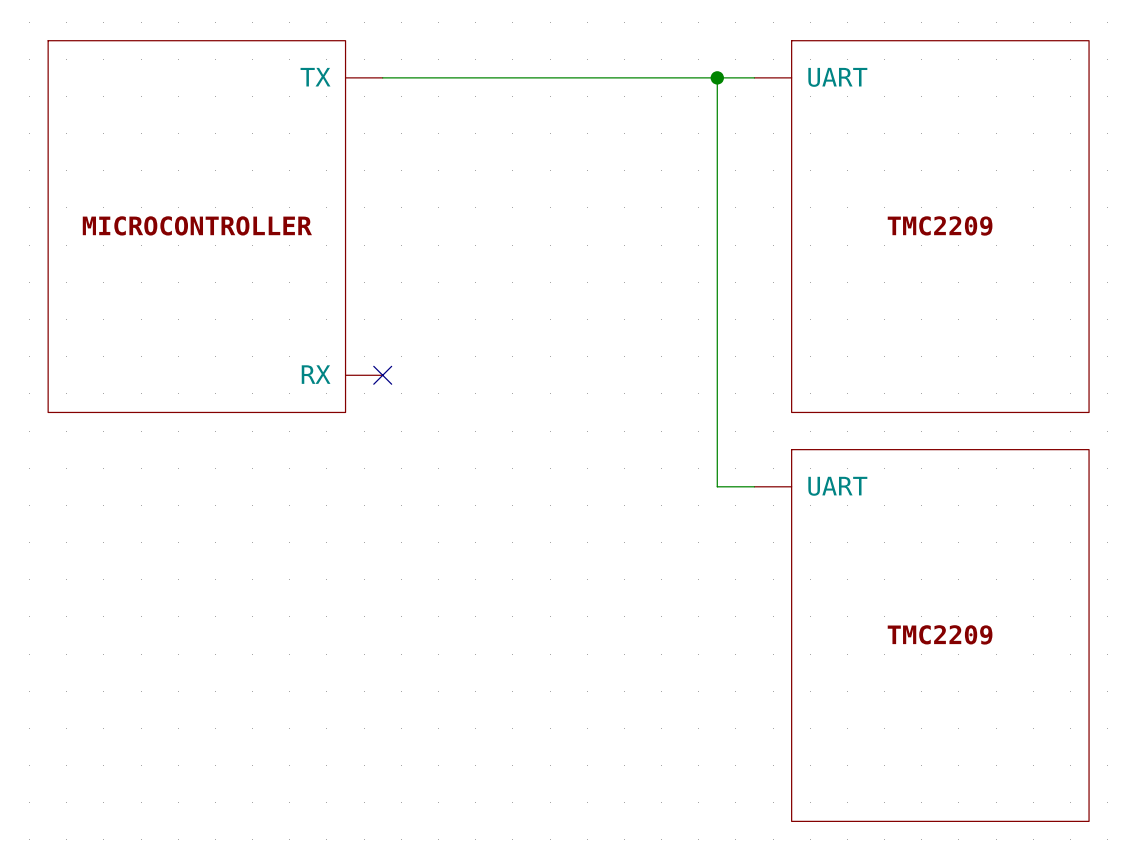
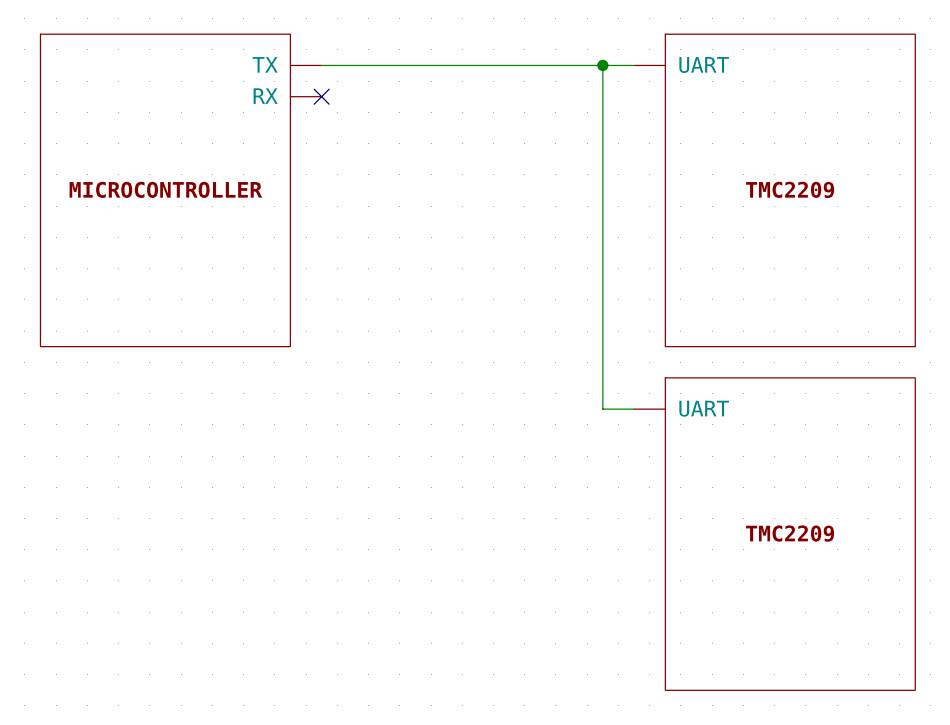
part symbol: [48, 40, 383, 413] -> [40, 34, 322, 347]
no-connect mark: none -> (321, 96)
no-connect mark: (382, 375) -> none

